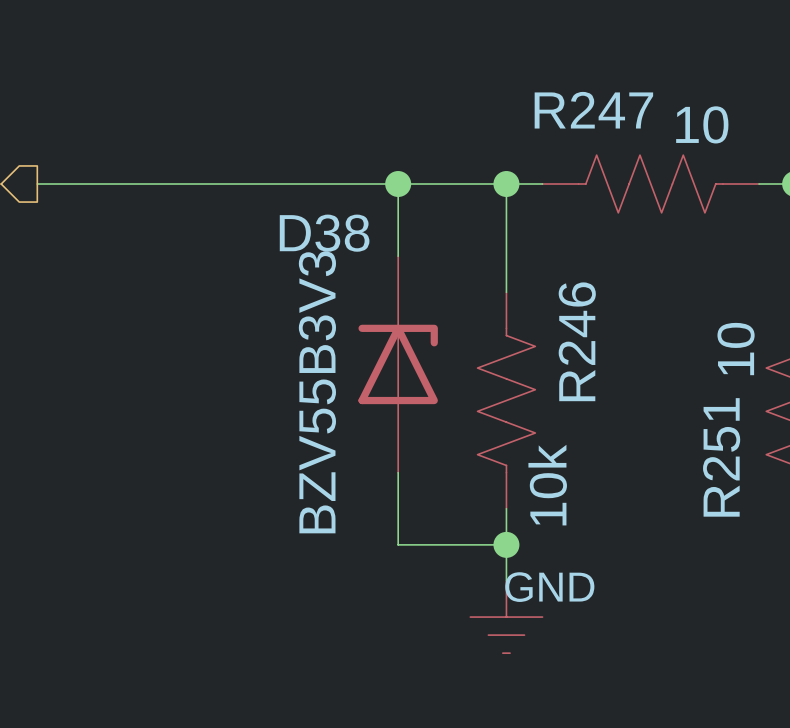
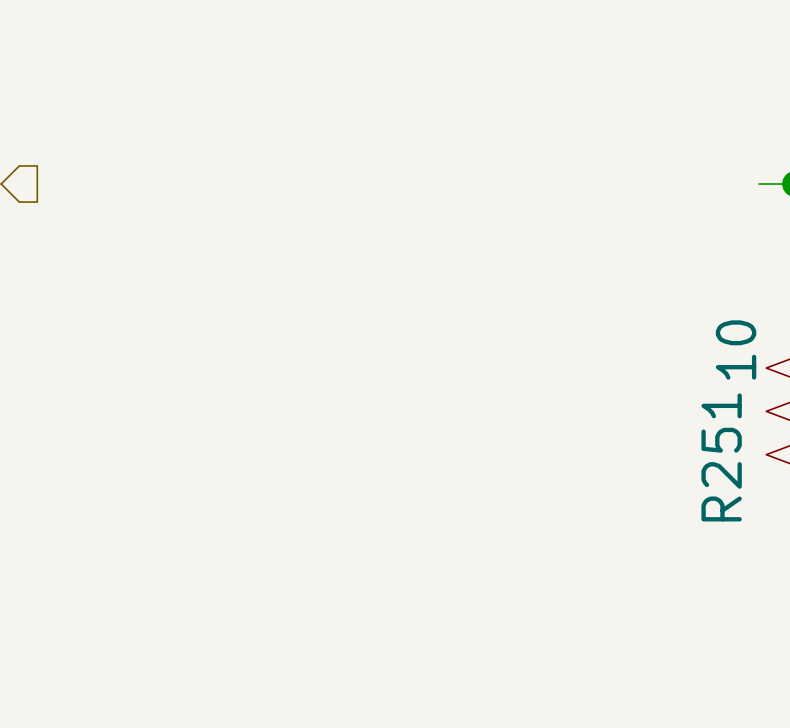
wire: (37, 184) (542, 184) -> none
wire: (398, 184) (398, 256) -> none
junction: (398, 184) -> none
wire: (506, 184) (506, 292) -> none
junction: (506, 184) -> none
R247: 10 (650, 184) -> none
D38: BZV55B3V3 (398, 364) -> none
R246: 10k (506, 400) -> none
wire: (398, 472) (398, 544) (506, 544) -> none
wire: (506, 508) (506, 580) -> none
junction: (506, 544) -> none
power symbol: GND (506, 617) -> none

